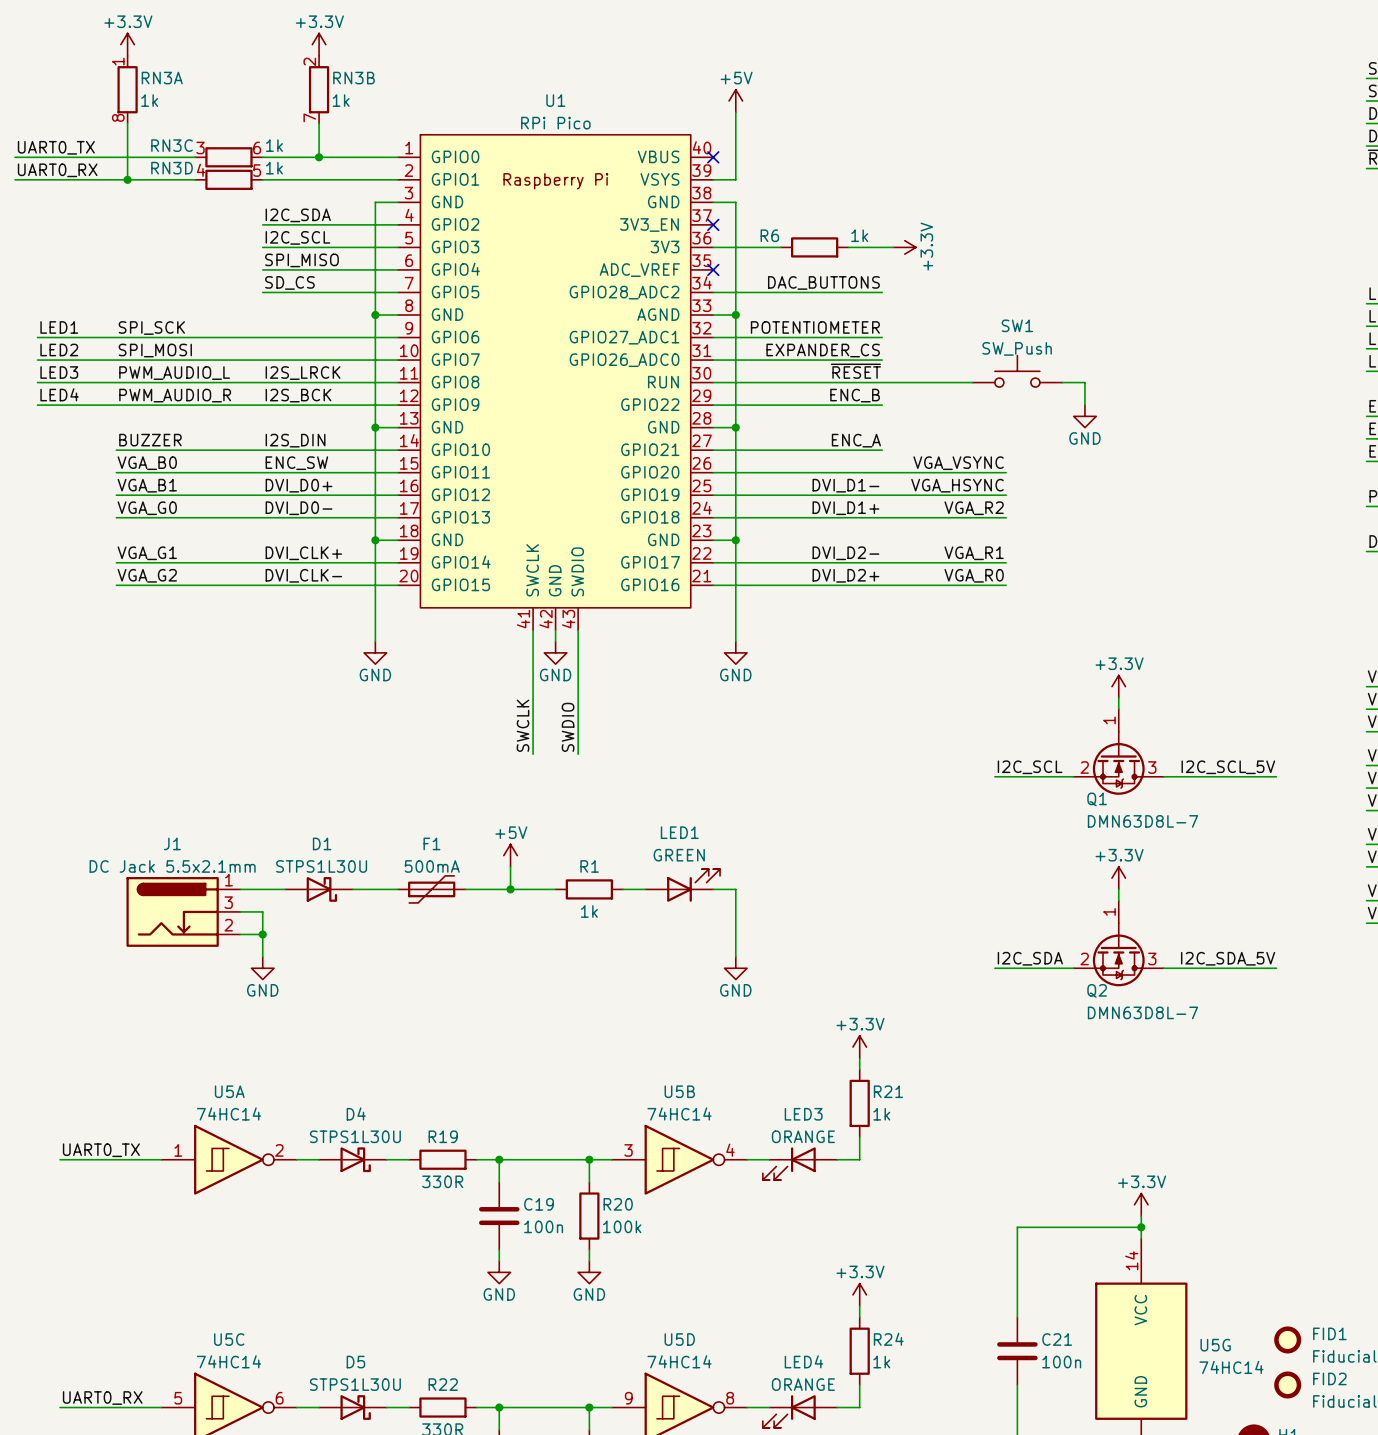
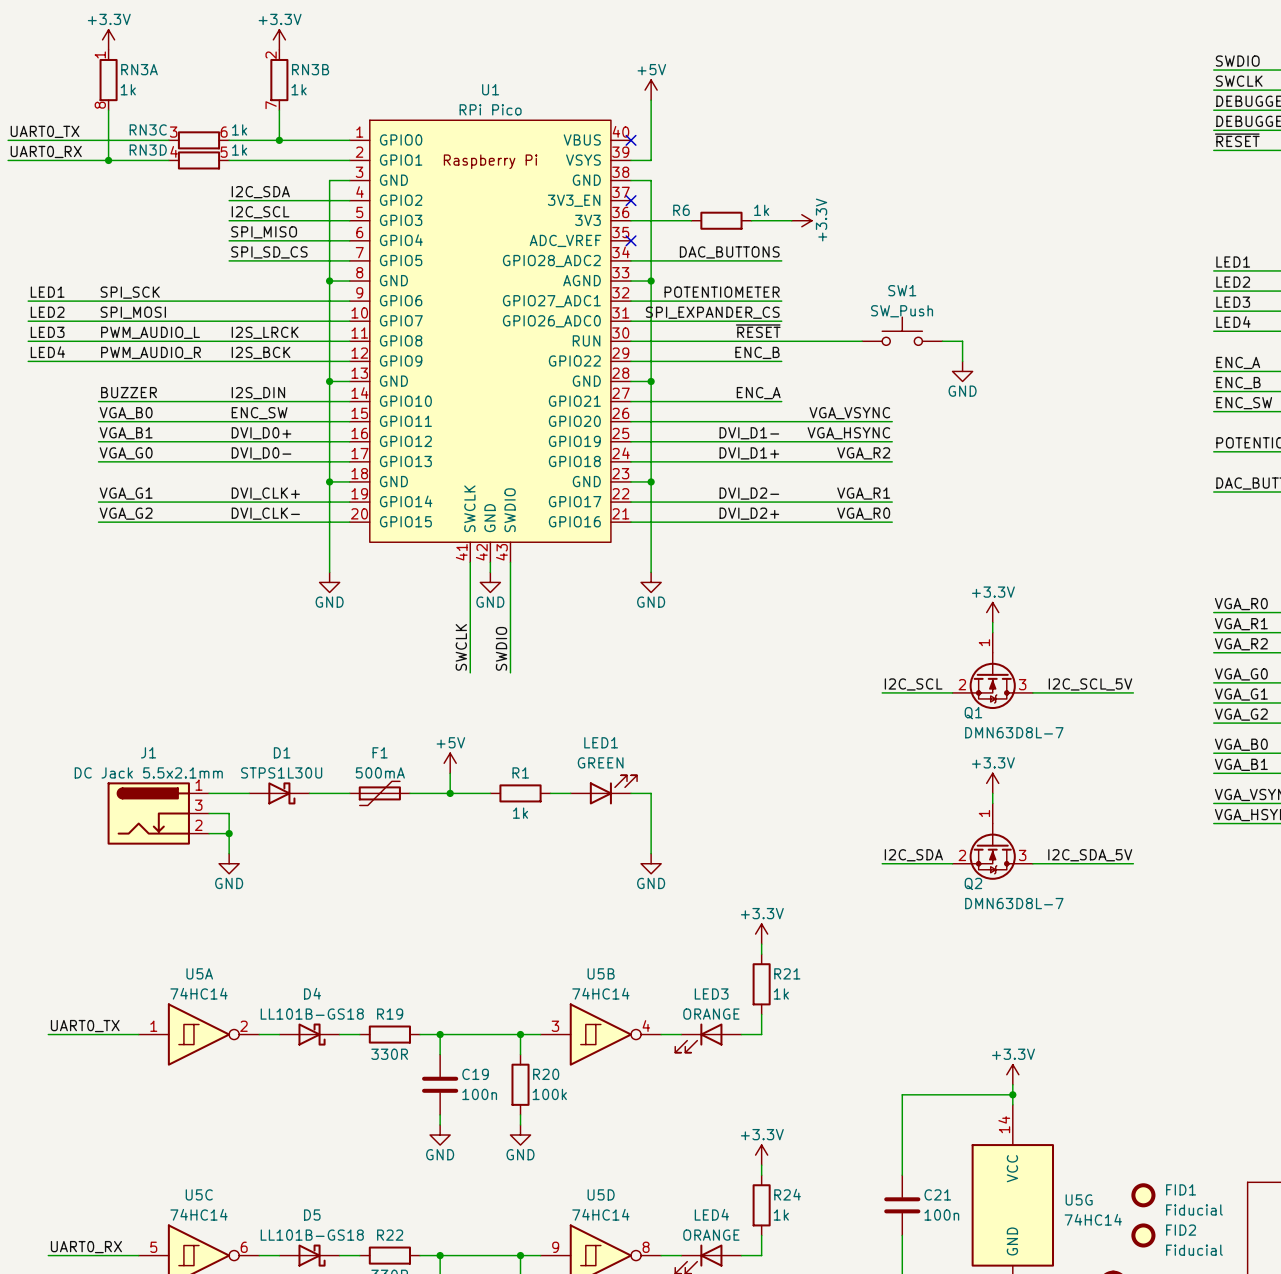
label: SD_CS (289, 282) -> SPI_SD_CS (269, 252)
label: EXPANDER_CS (823, 350) -> SPI_EXPANDER_CS (712, 312)
D4 value: STPS1L30U (355, 1136) -> LL101B-GS18 (312, 1014)
D5 value: STPS1L30U (355, 1384) -> LL101B-GS18 (312, 1235)

